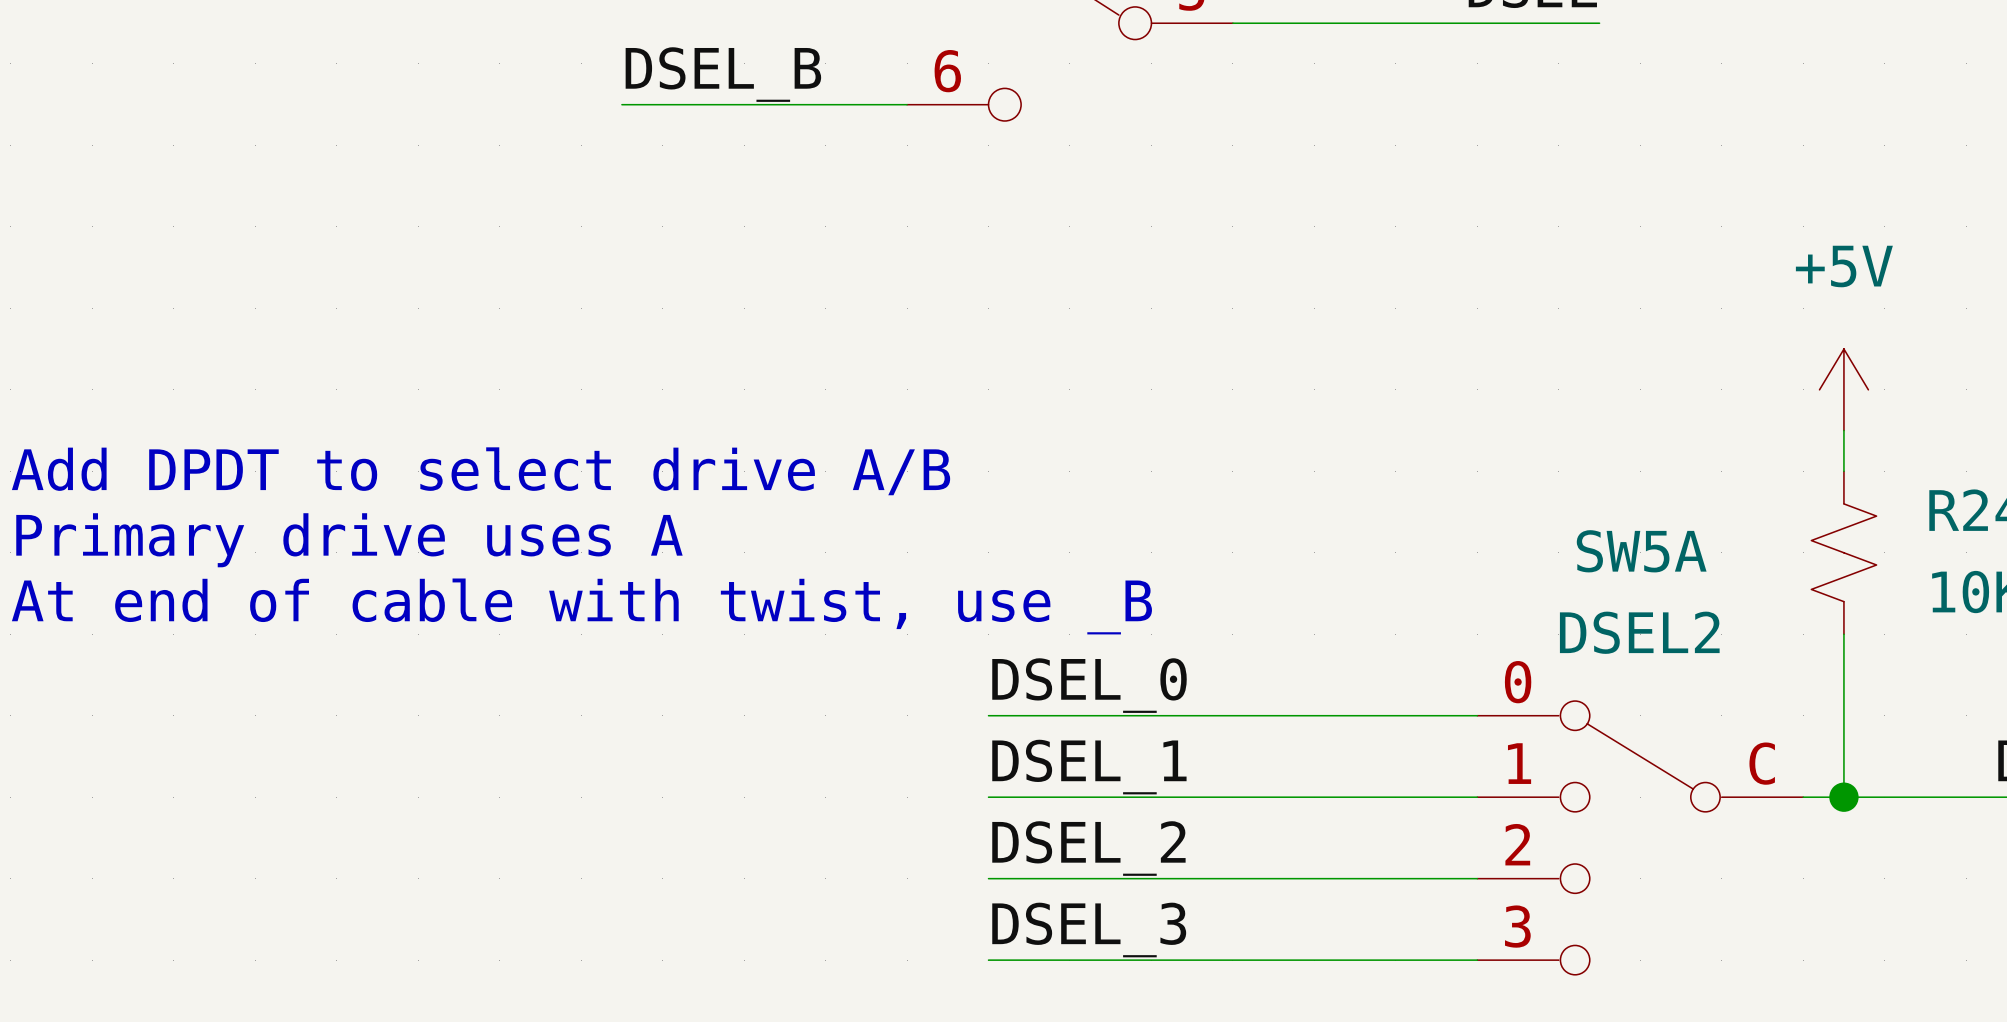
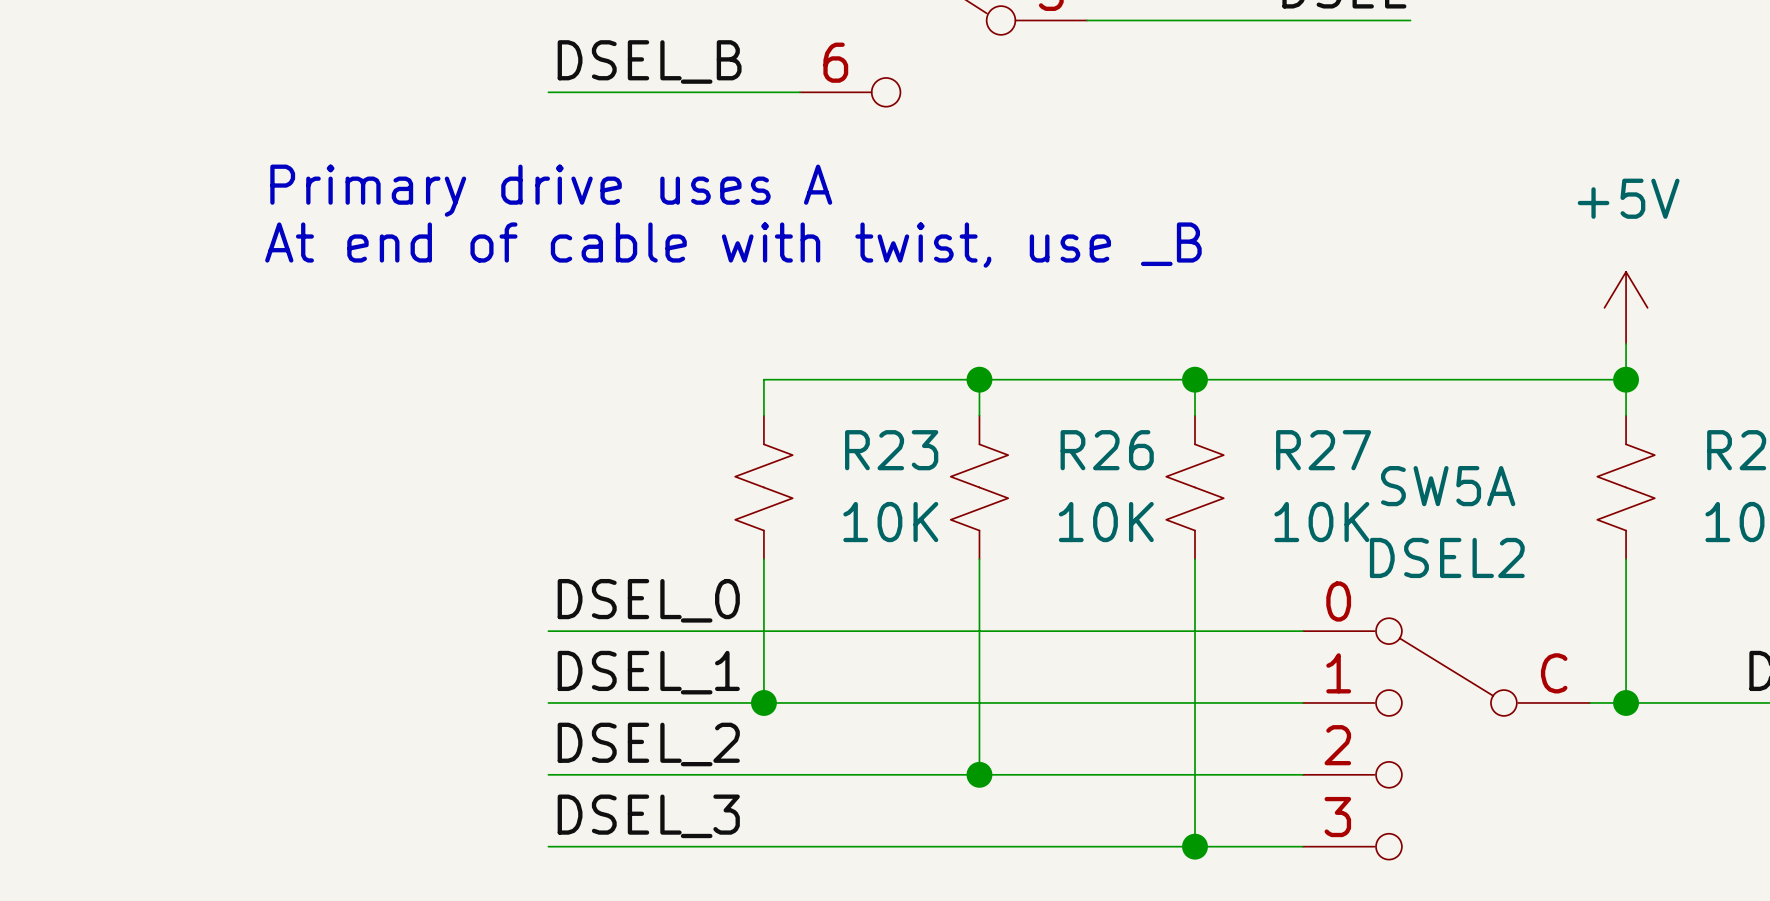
wire: none -> (1626, 343) (1626, 379) (763, 379) (763, 415)
power symbol position: +5V (1843, 389) -> +5V (1626, 307)
wire: none -> (979, 379) (979, 415)
junction: none -> (979, 379)
wire: none -> (1195, 379) (1195, 415)
junction: none -> (1195, 379)
junction: none -> (1626, 379)
text: Add DPDT to select drive A/B (481, 471) -> none
text position: Primary drive uses A (349, 540) -> Primary drive uses A (551, 190)
R23: none -> 10K (763, 487)
R26: none -> 10K (979, 487)
R27: none -> 10K (1195, 487)
text position: At end of cable with twist, use _B (581, 606) -> At end of cable with twist, use _B (733, 245)
wire: none -> (763, 559) (763, 702)
wire: none -> (979, 559) (979, 774)
wire: none -> (1195, 559) (1195, 846)
label position: DSEL_0 (1089, 685) -> DSEL_0 (648, 600)
wire: none -> (548, 631) (871, 631)
label position: DSEL_1 (1089, 767) -> DSEL_1 (648, 672)
wire: none -> (548, 702) (871, 702)
junction: none -> (763, 702)
label position: DSEL_2 (1088, 848) -> DSEL_2 (648, 744)
wire: none -> (548, 774) (871, 774)
junction: none -> (979, 774)
label position: DSEL_3 (1089, 930) -> DSEL_3 (648, 816)
wire: none -> (548, 846) (871, 846)
junction: none -> (1195, 846)

